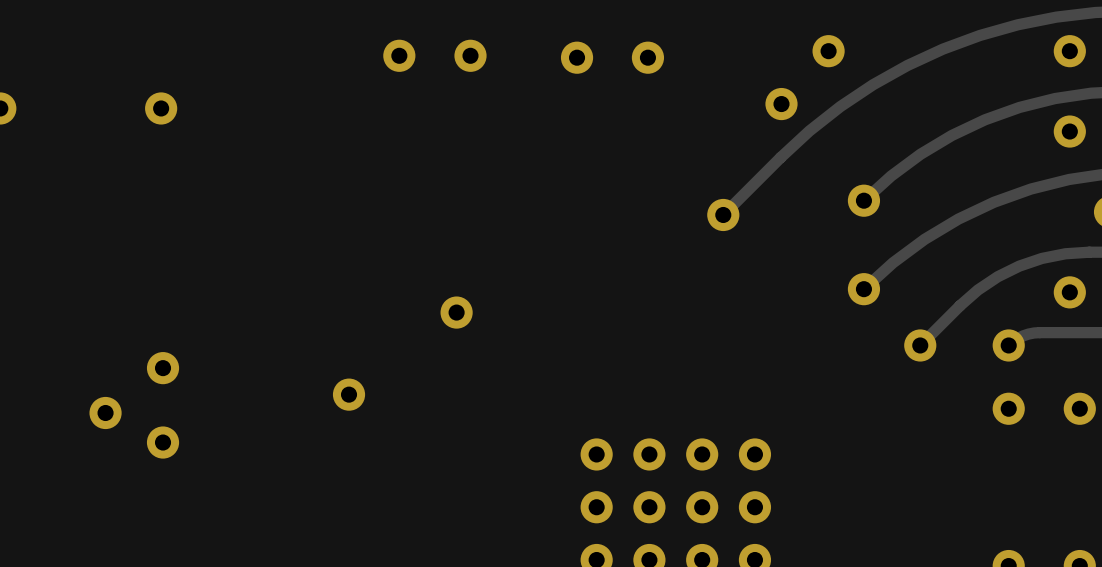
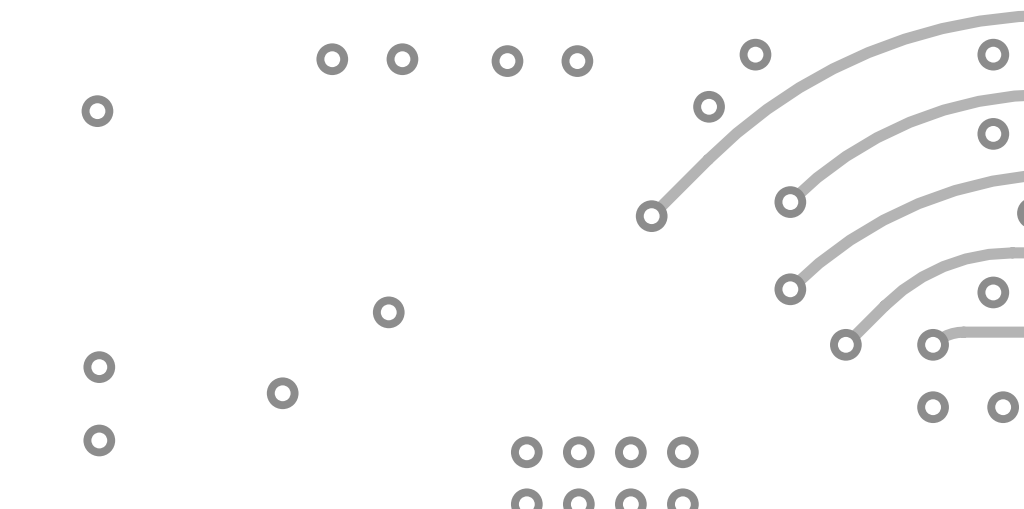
via: (105, 412) -> none

